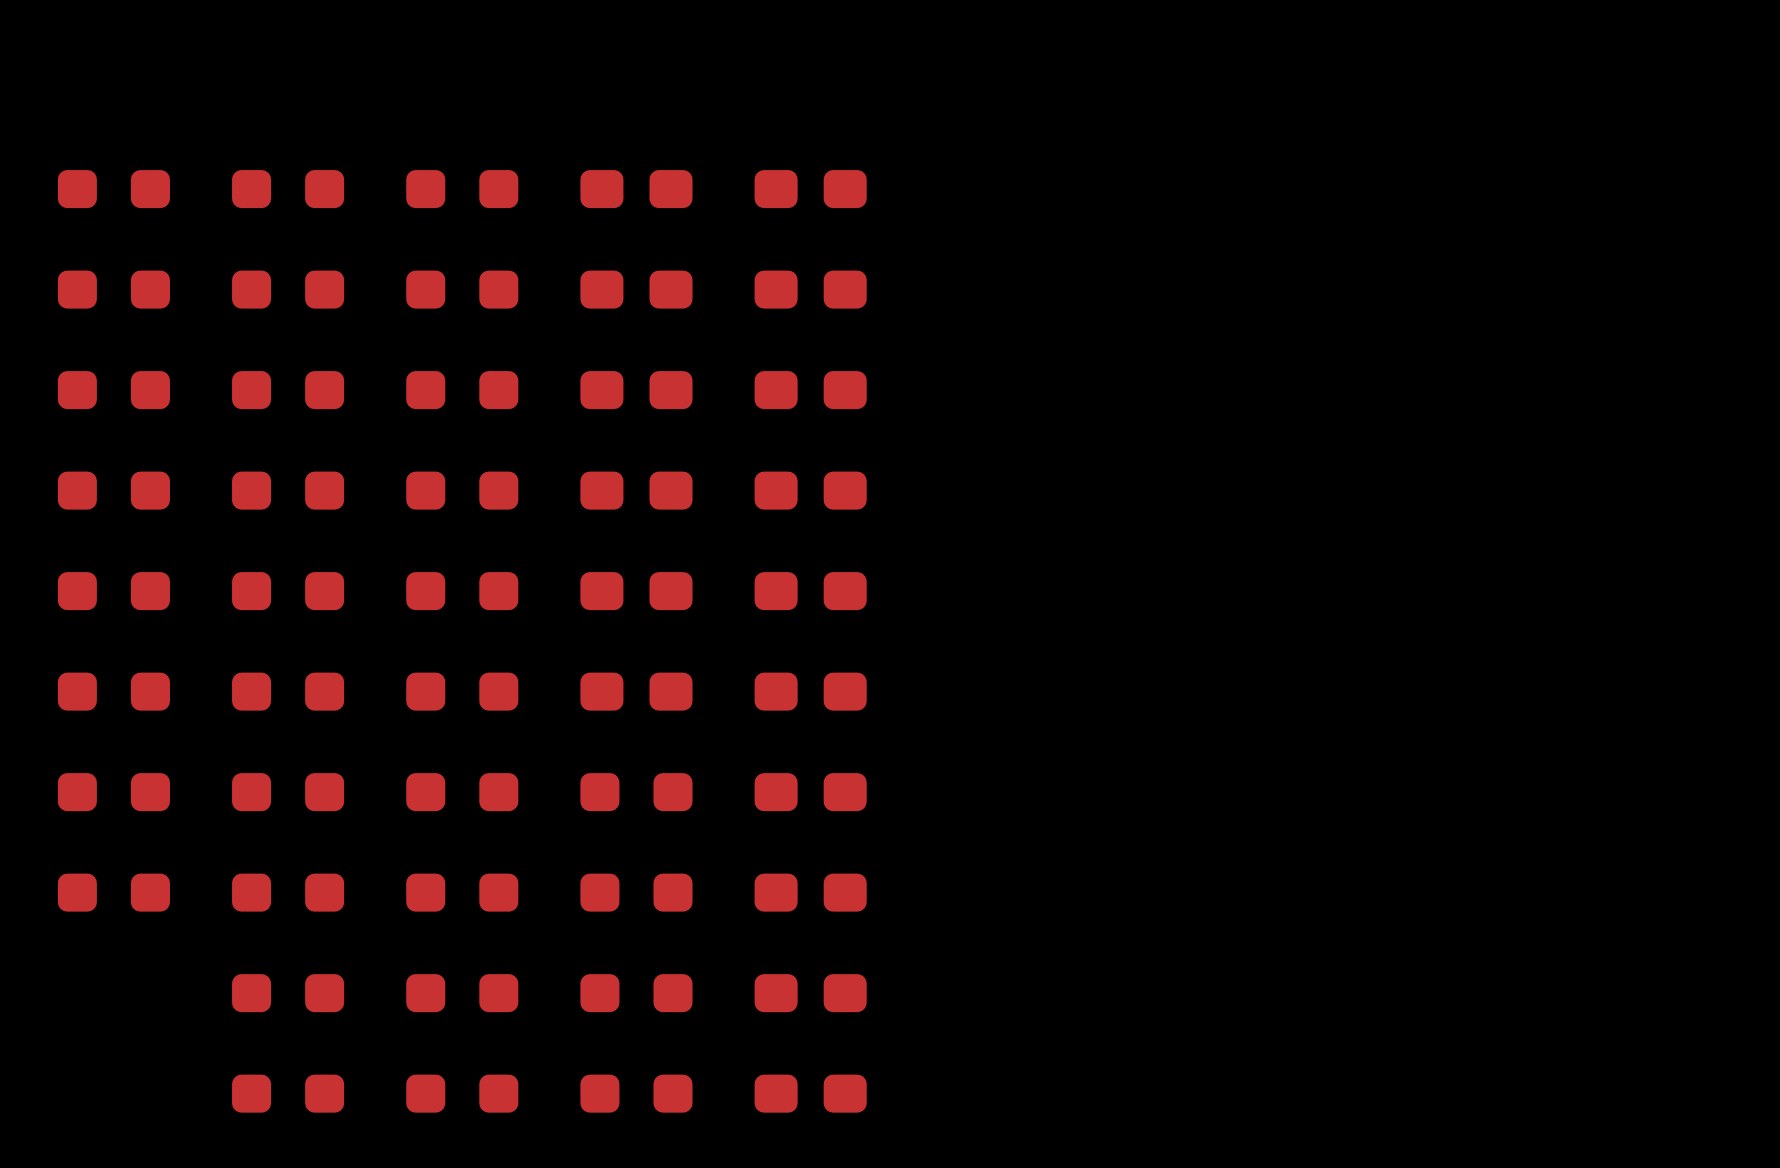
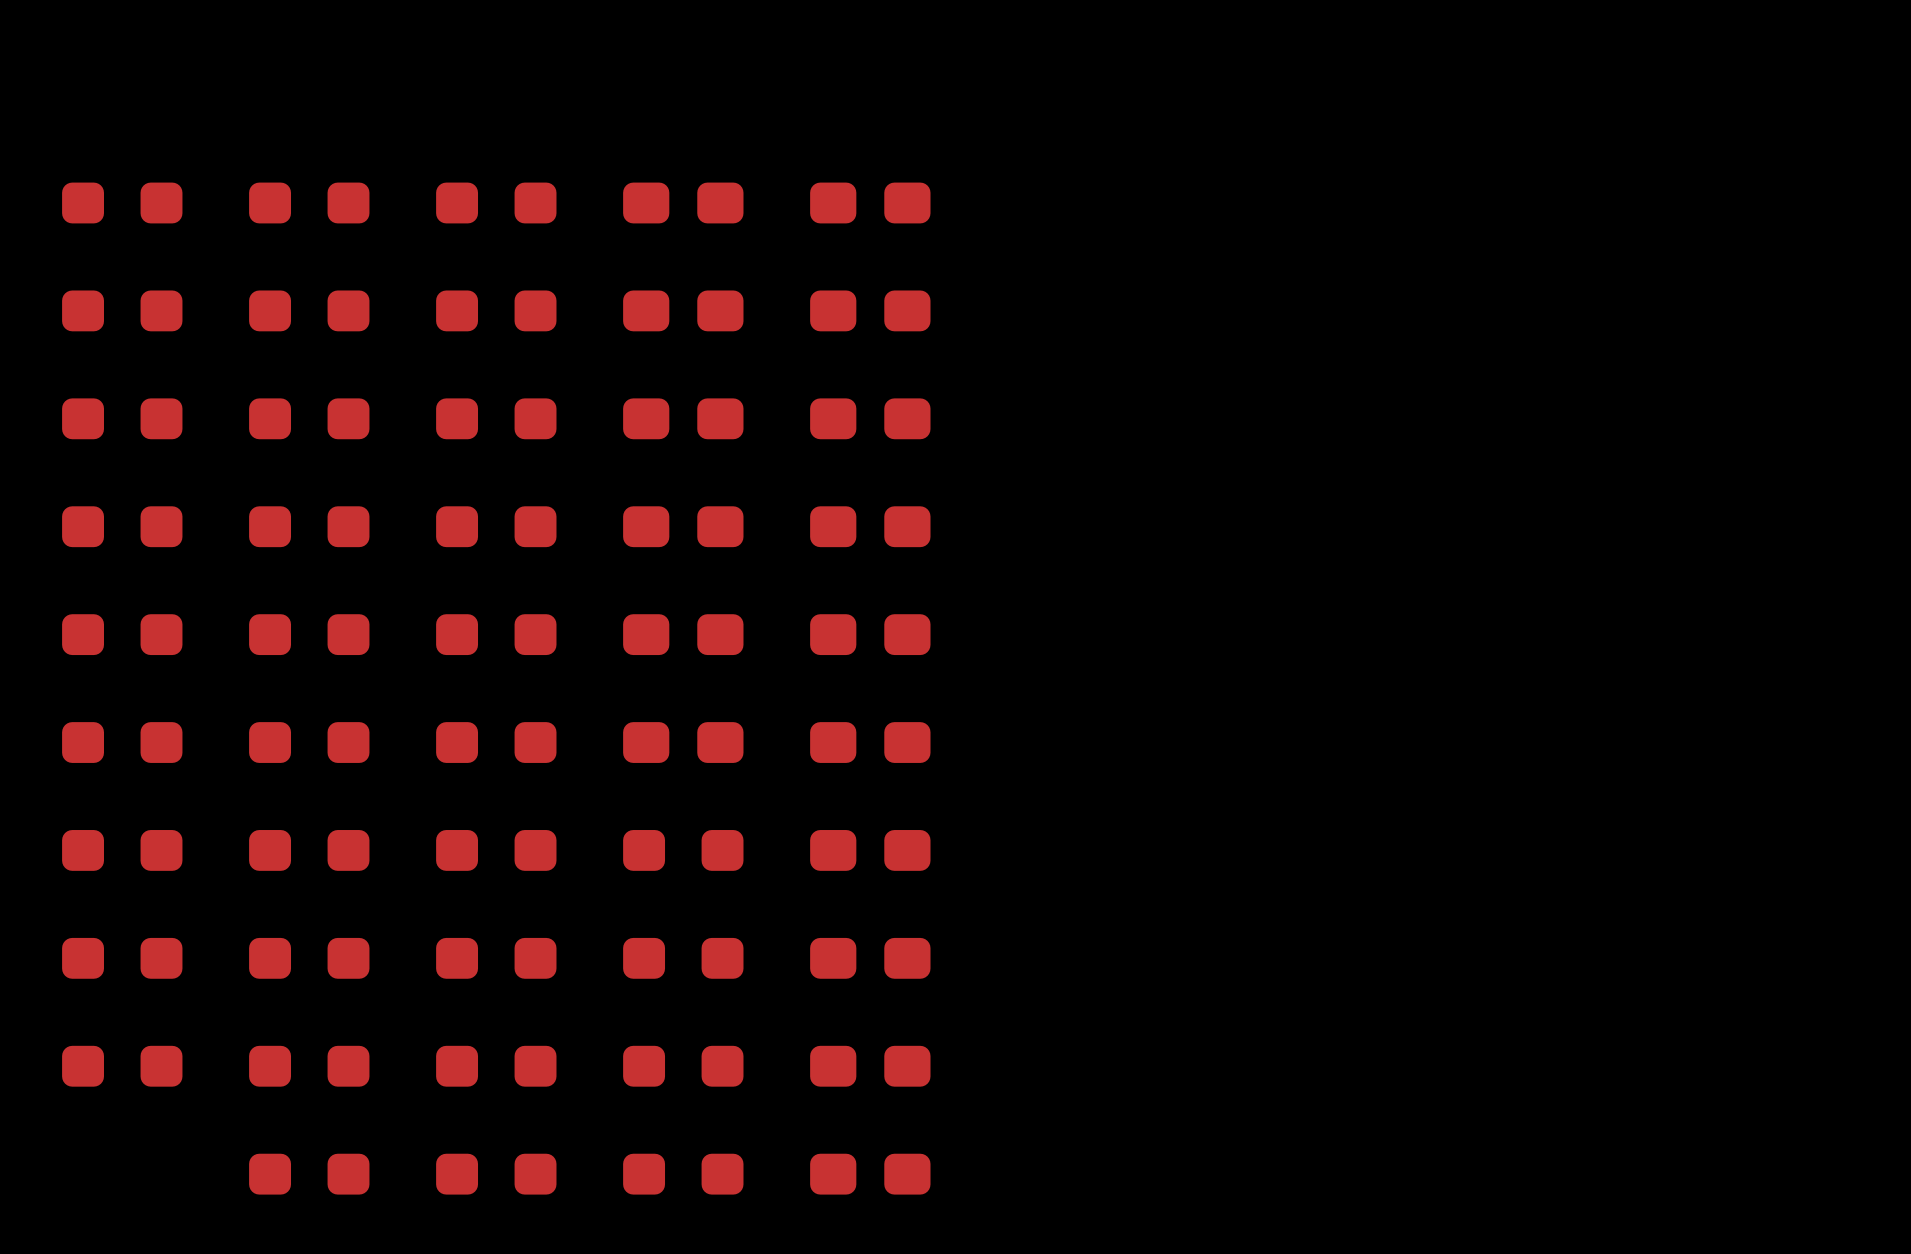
part: none -> (122, 1066)

